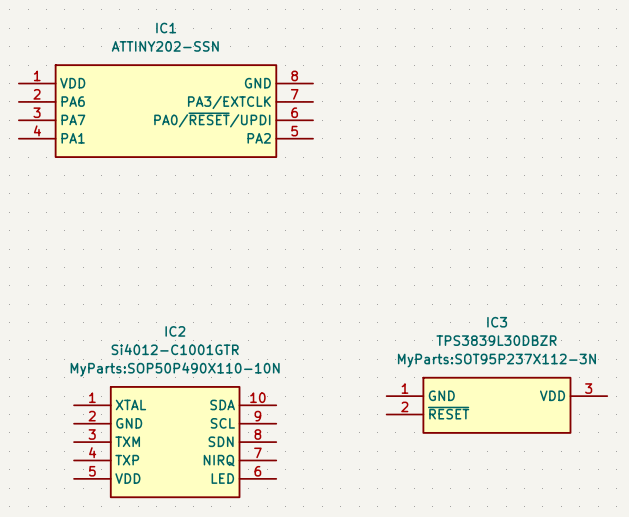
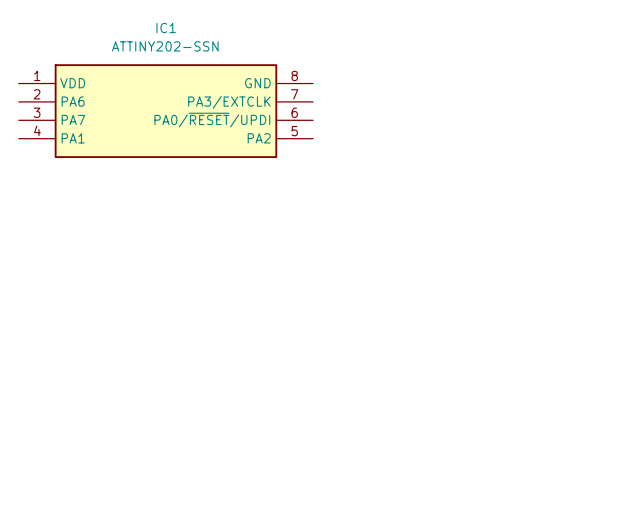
IC3: TPS3839L30DBZR (496, 405) -> none
IC2: Si4012-C1001GTR (175, 442) -> none

